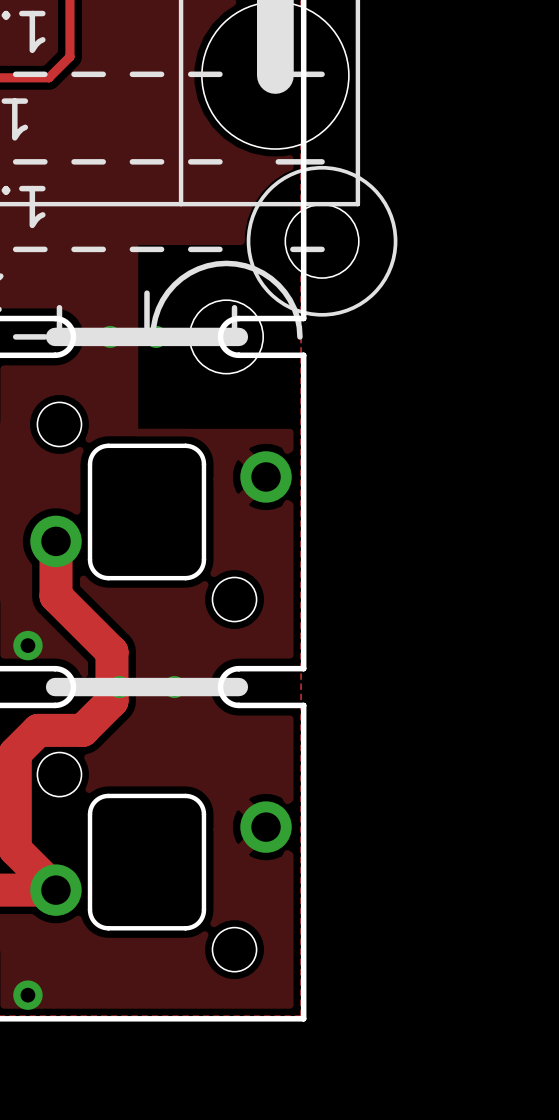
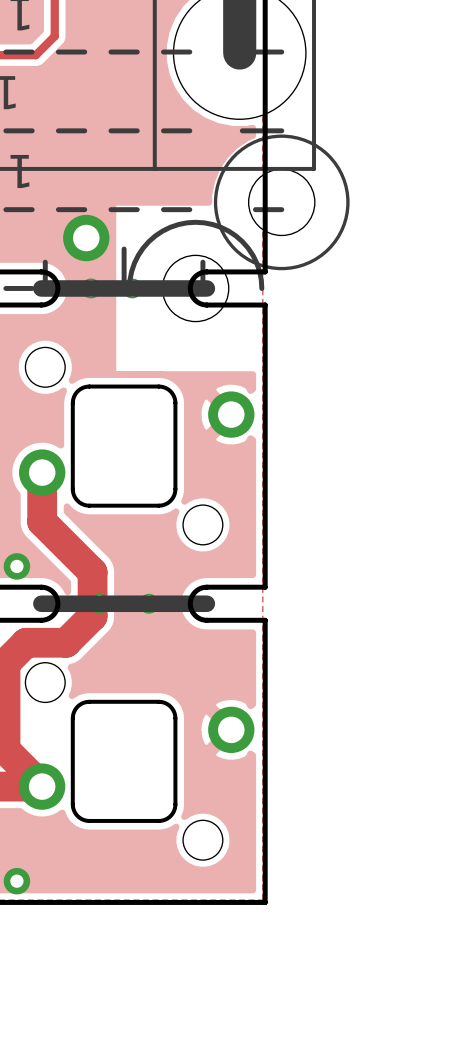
via: none -> (86, 238)

